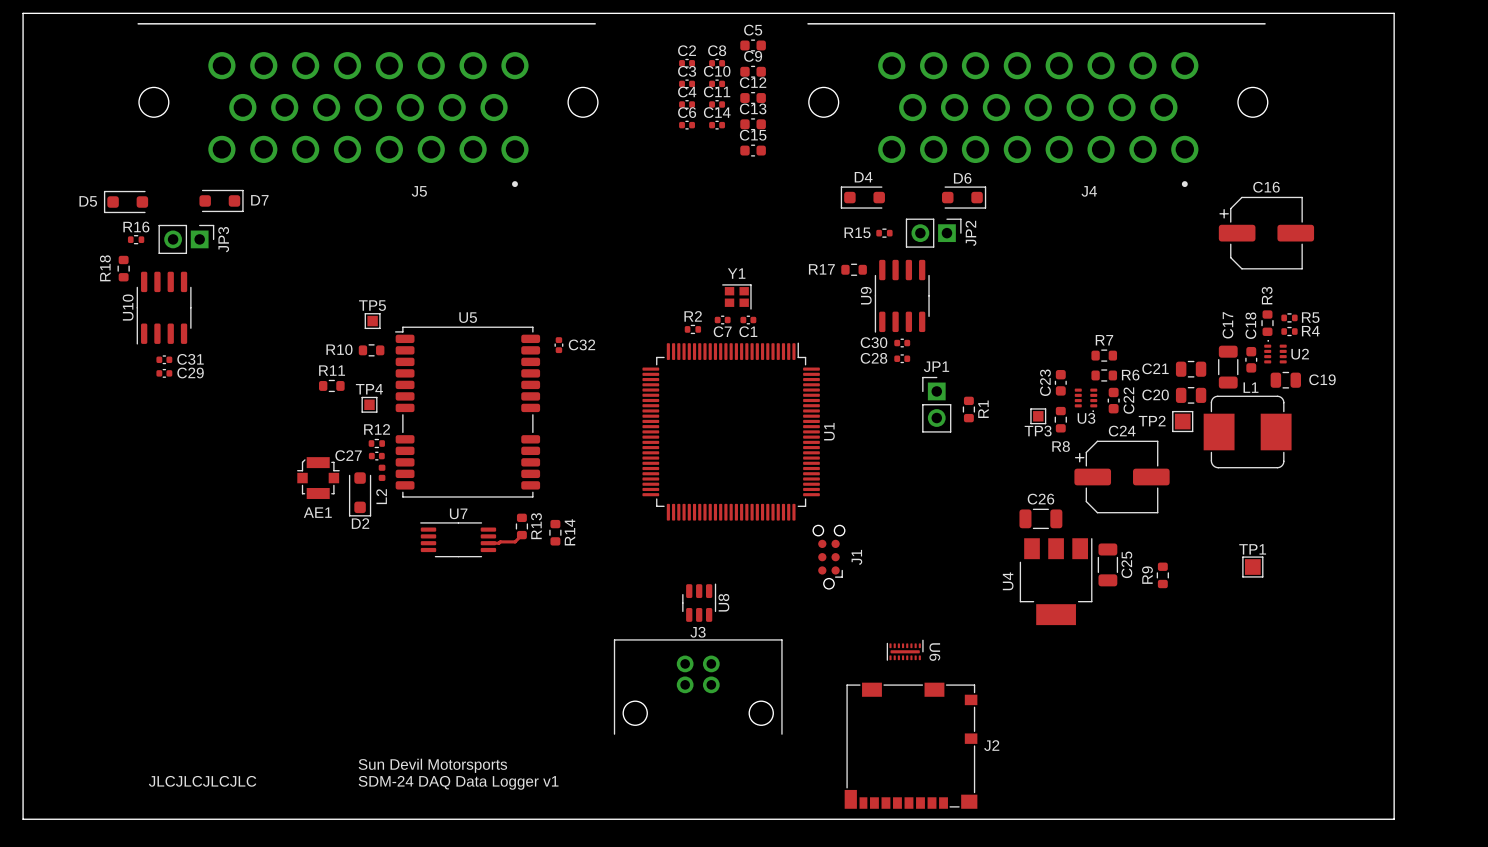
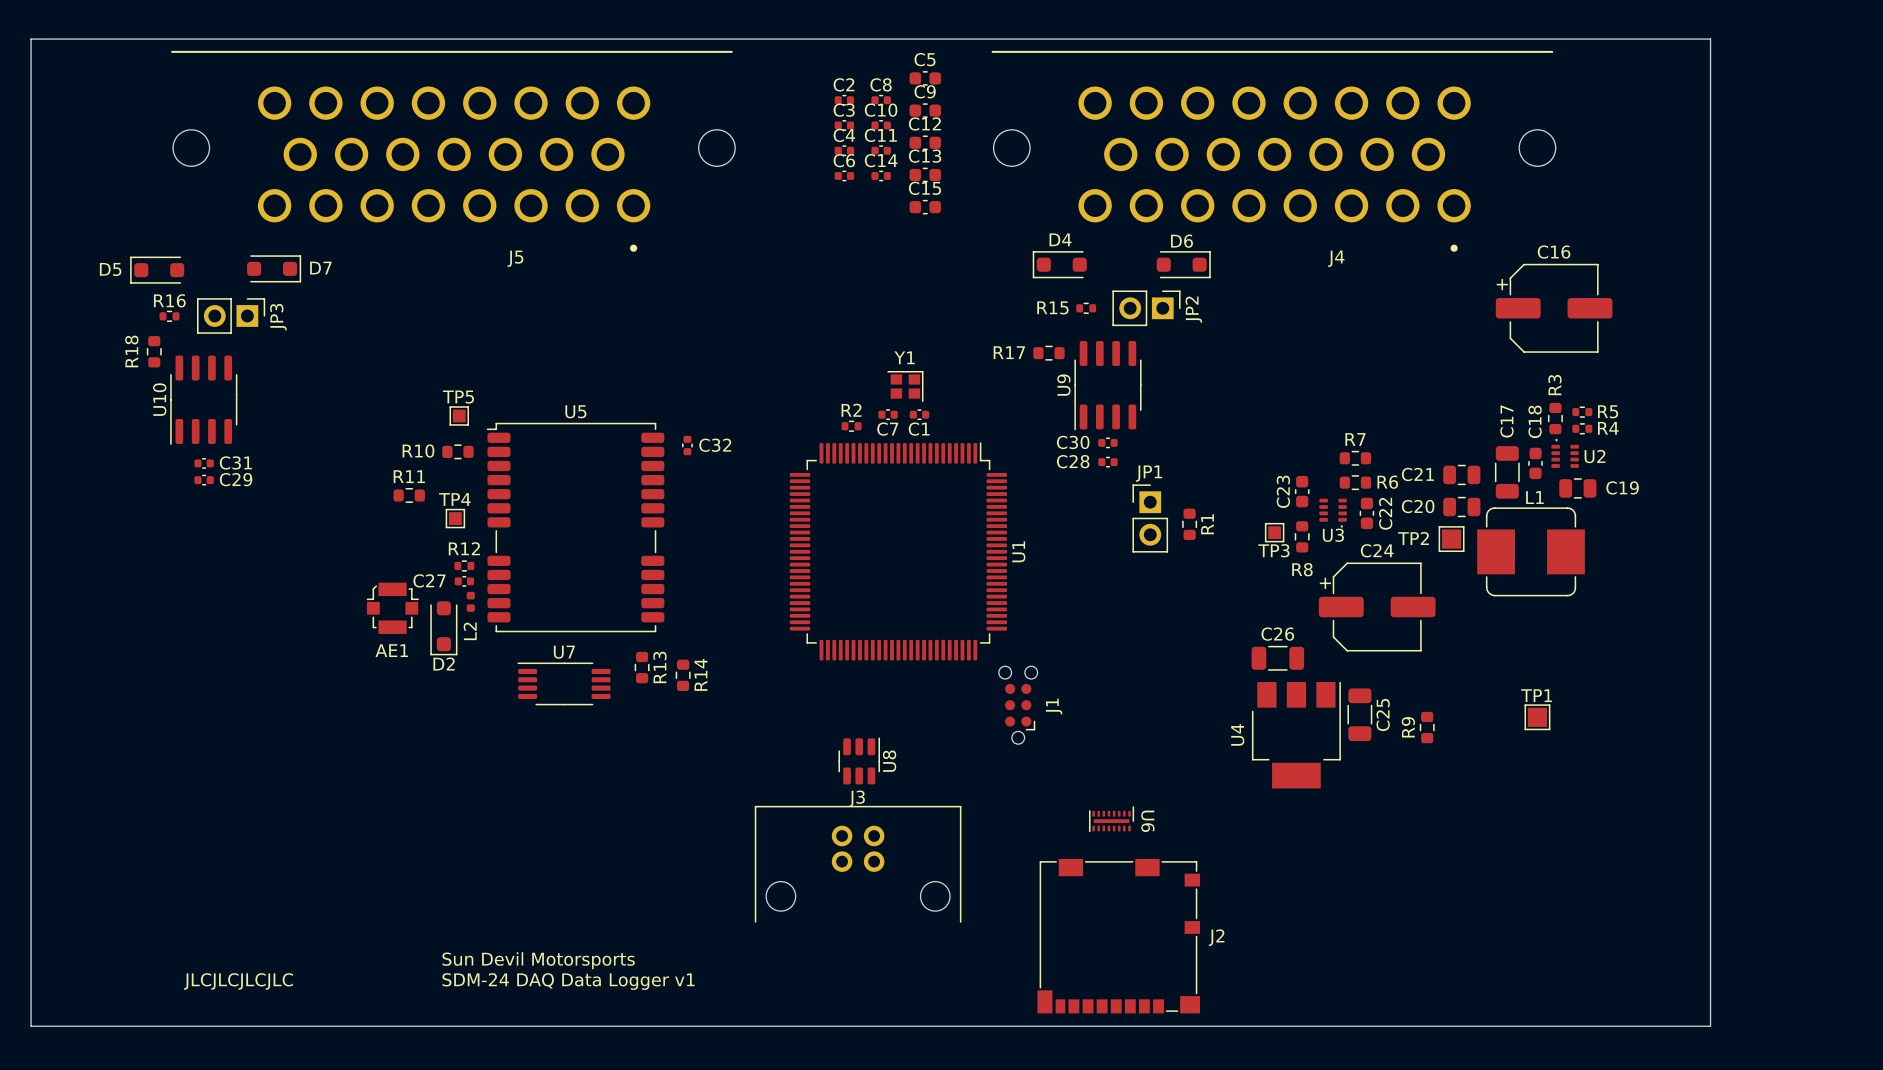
top track: (521, 535) (515, 541) (488, 543) -> none

